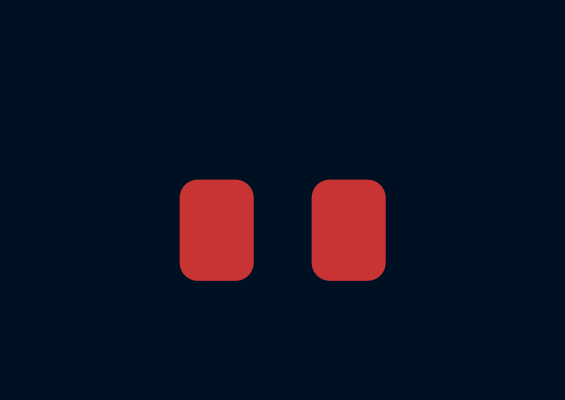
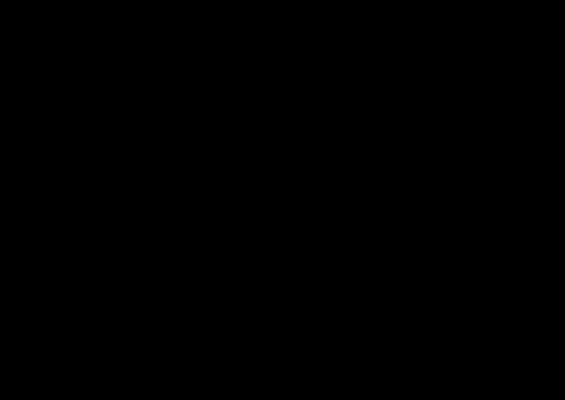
part: (282, 230) -> none

